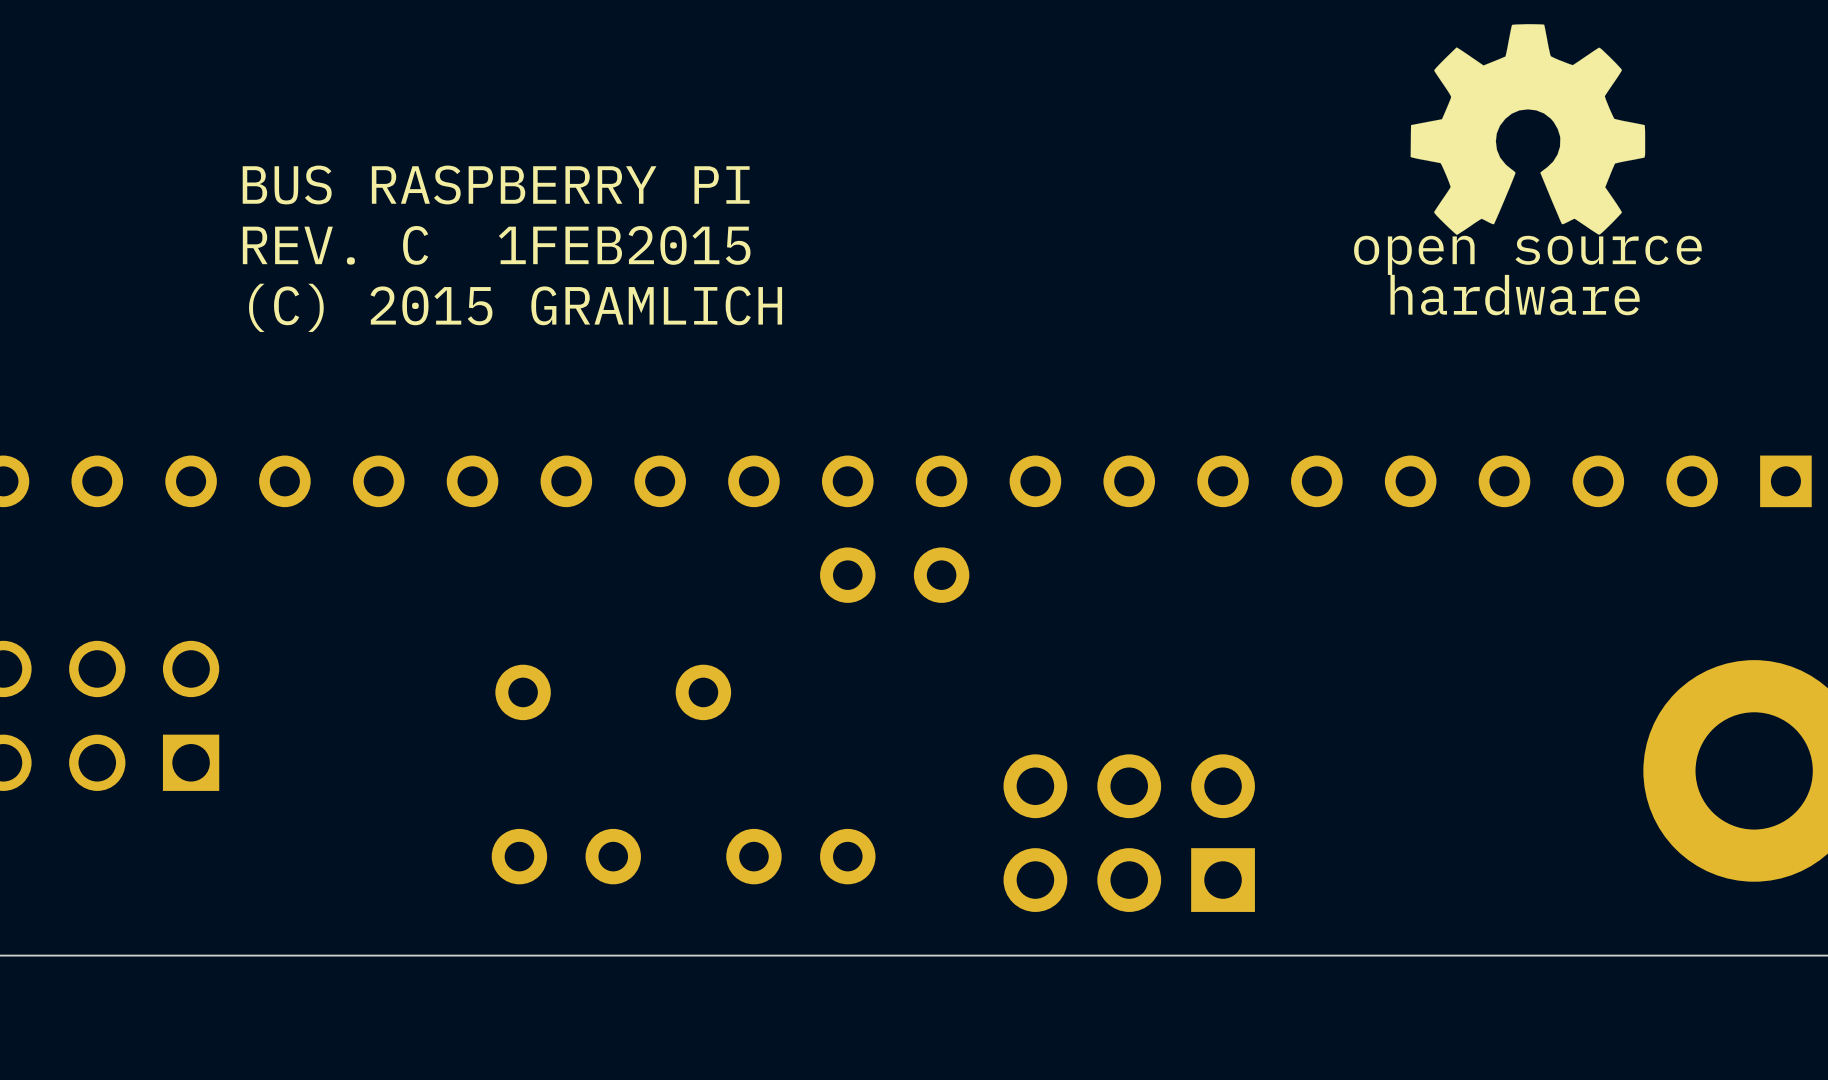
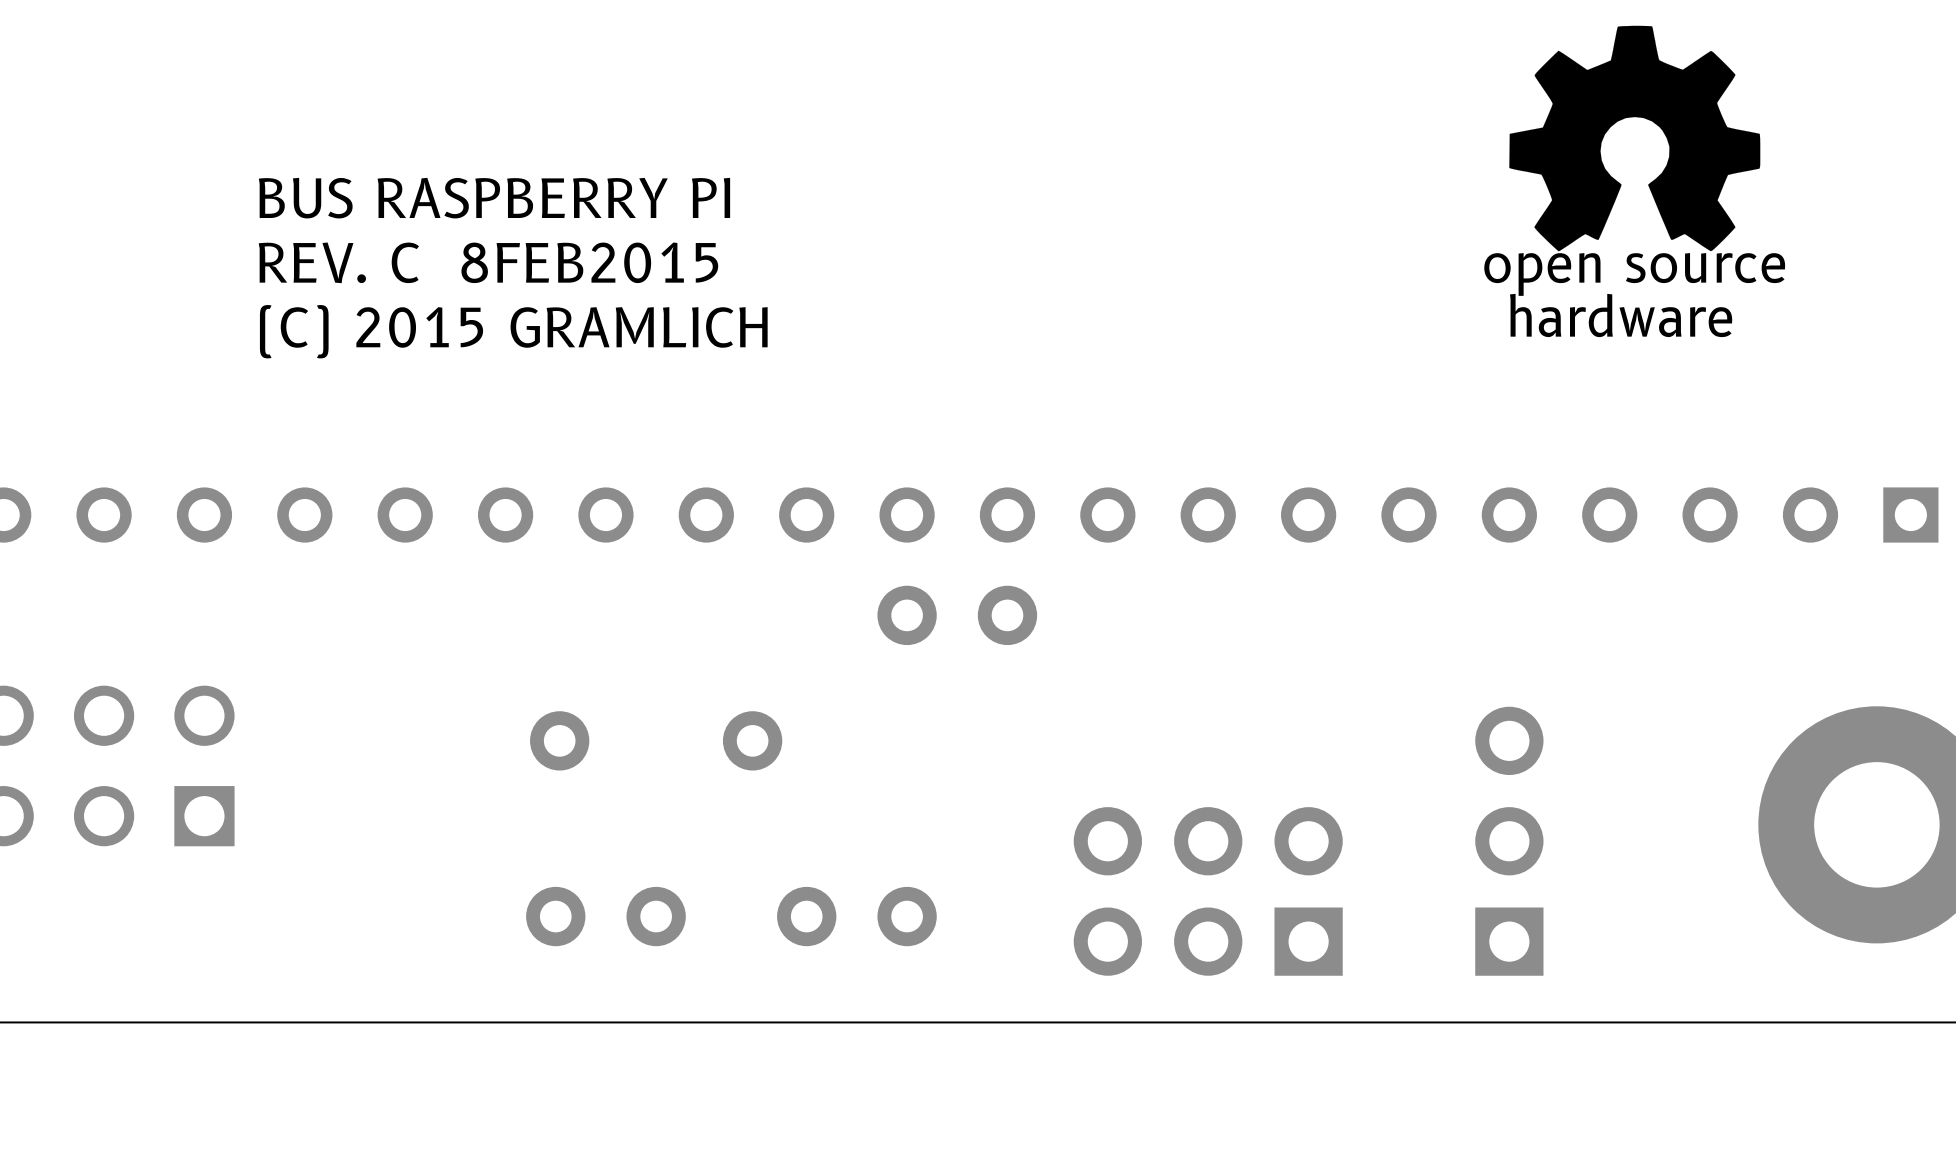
text: REV. C 1FEB2015 (496, 245) -> REV. C 8FEB2015 (488, 262)
part: none -> (1509, 841)

